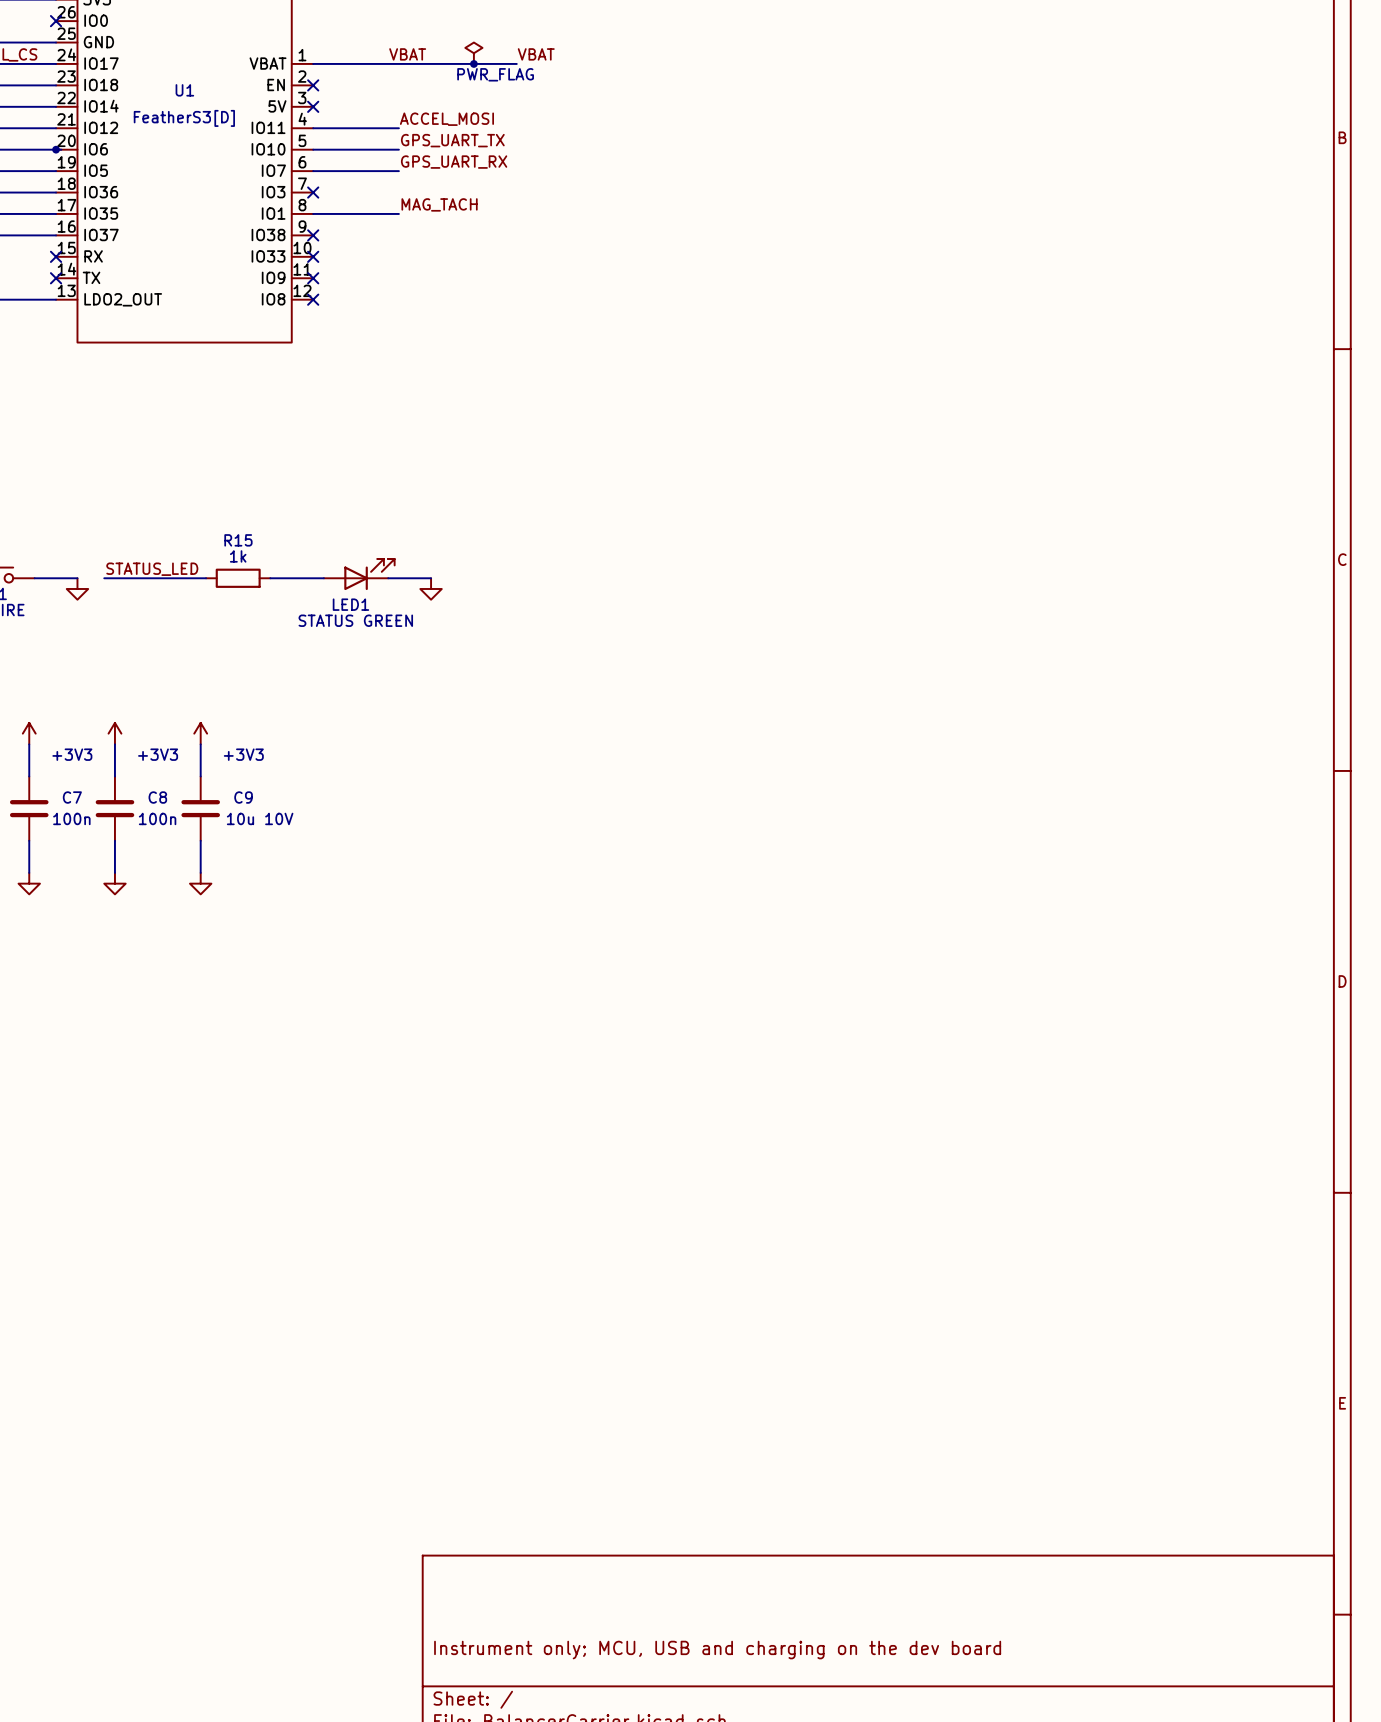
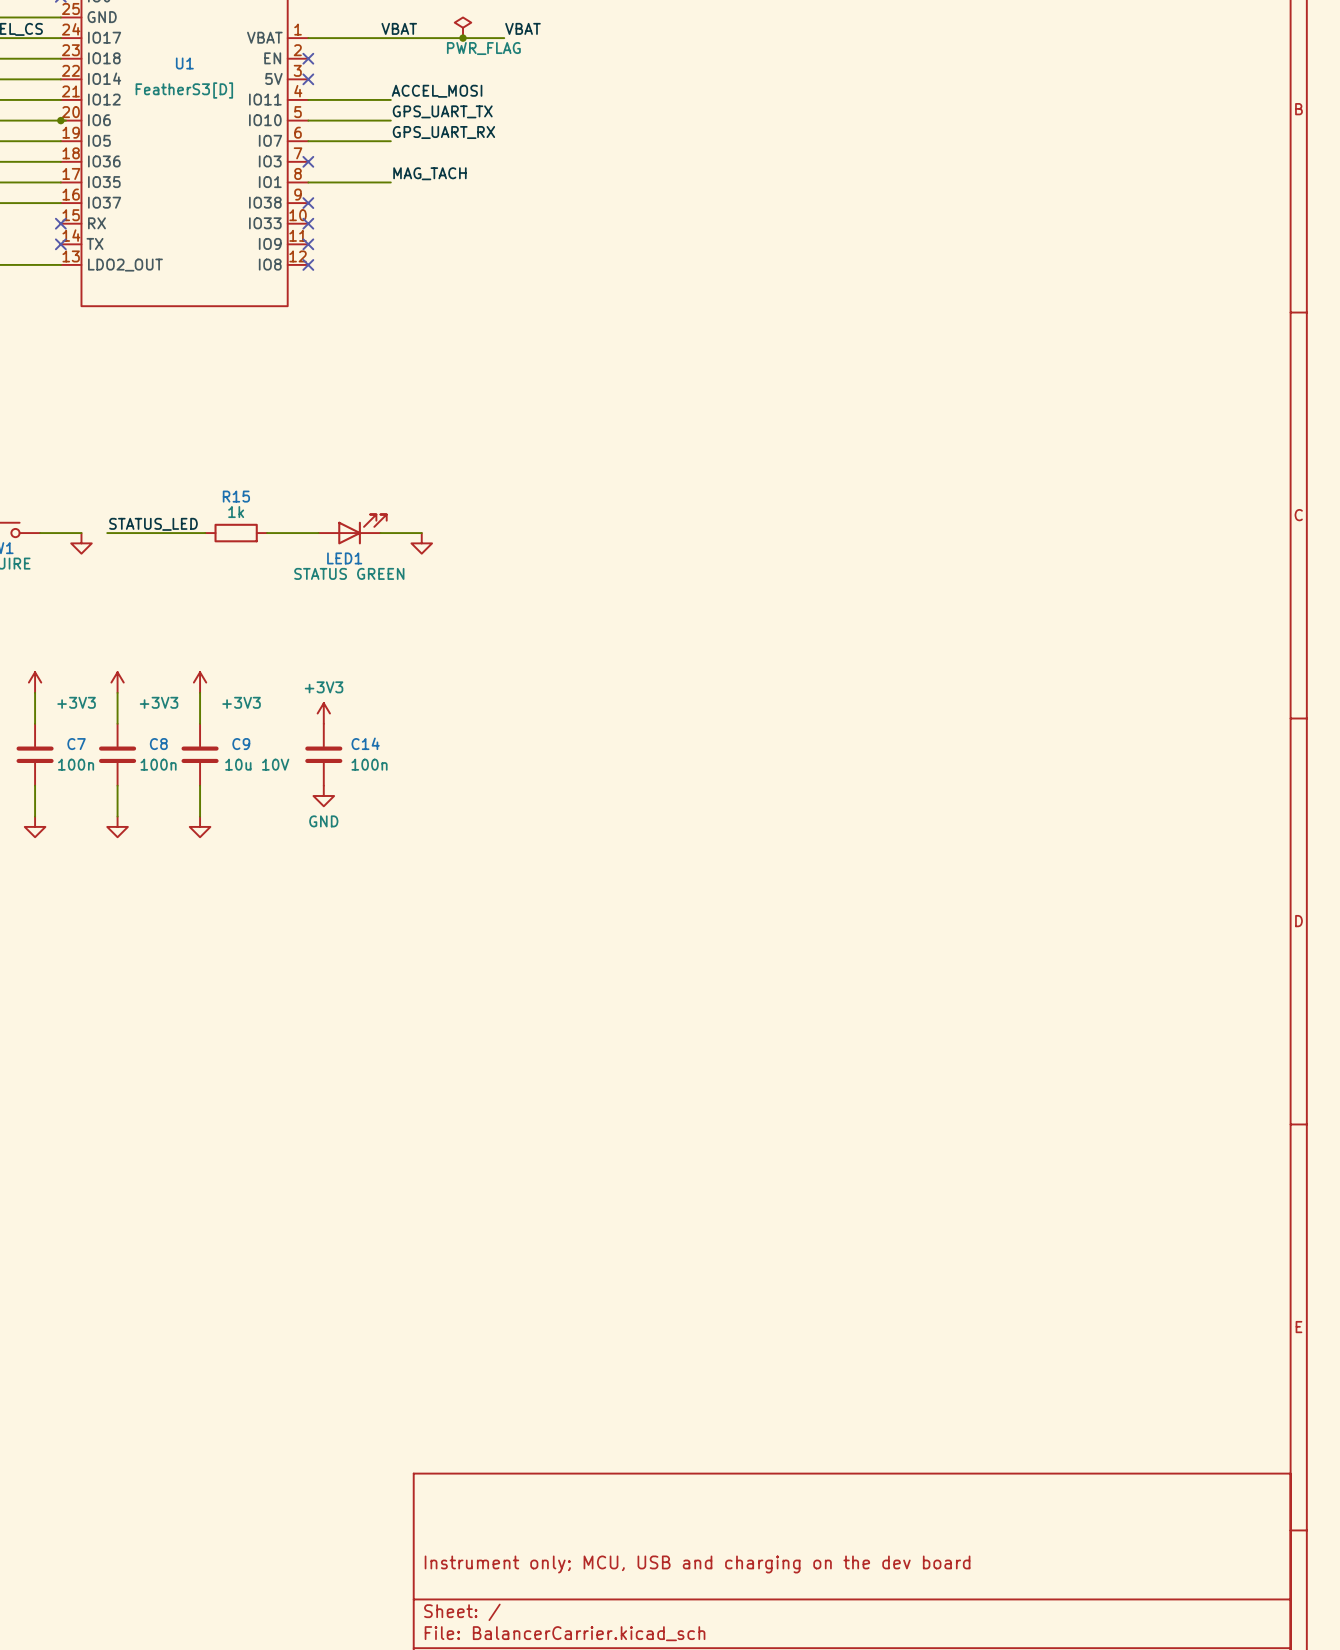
power symbol: none -> +3V3 (323, 713)
C14: none -> 100n (323, 754)
power symbol: none -> GND (323, 796)

